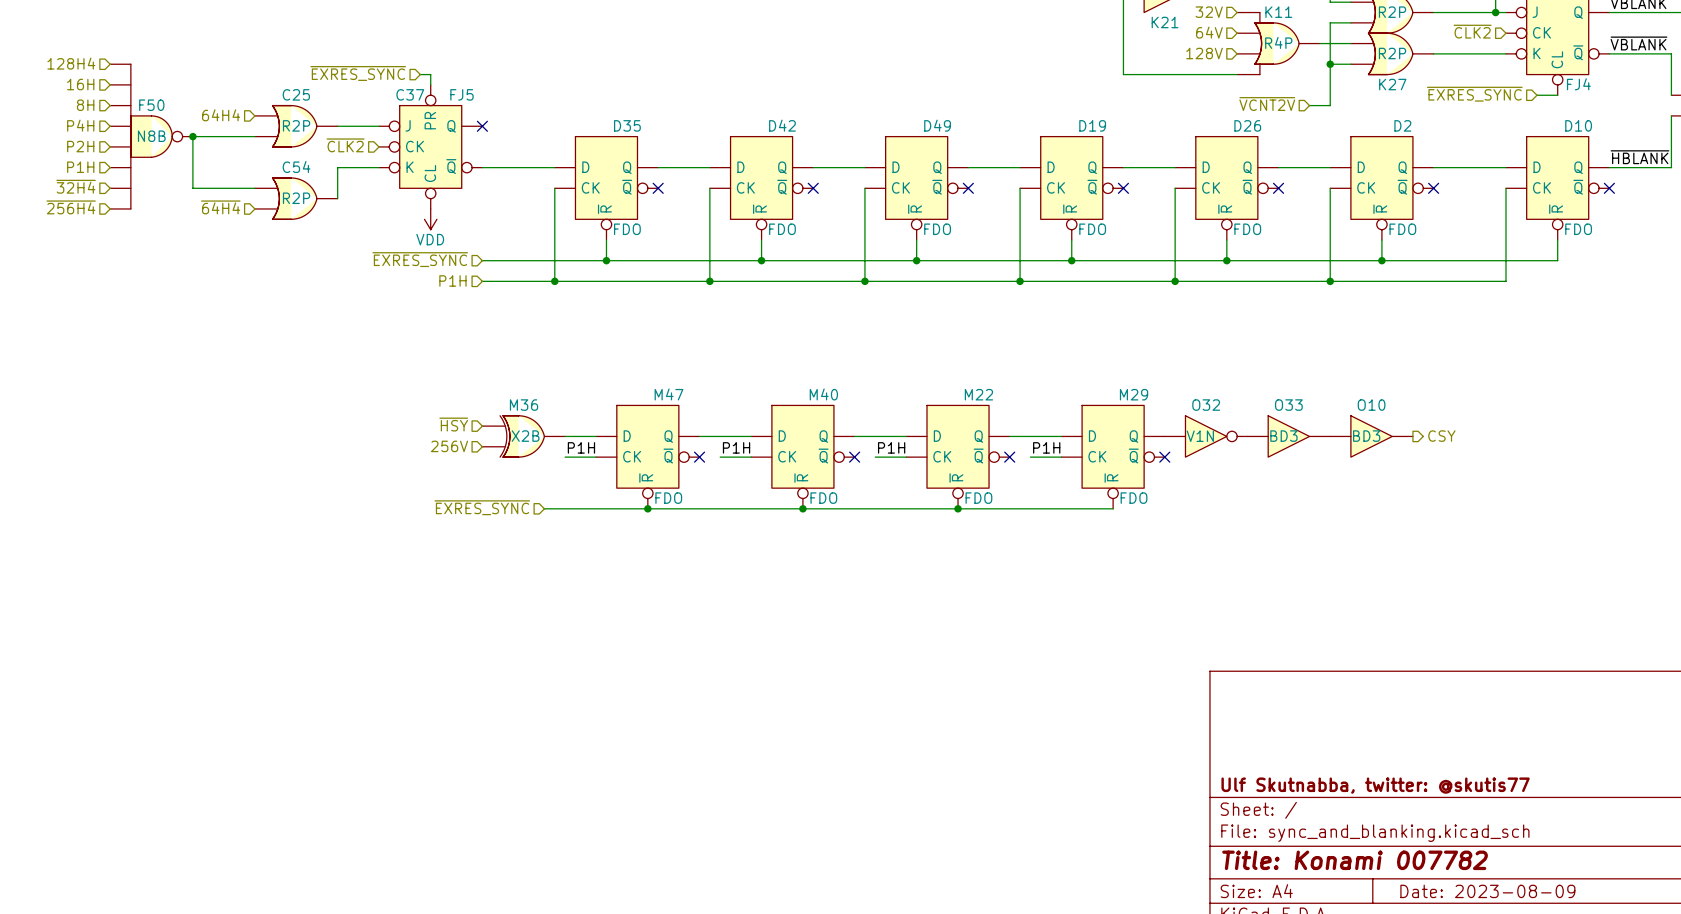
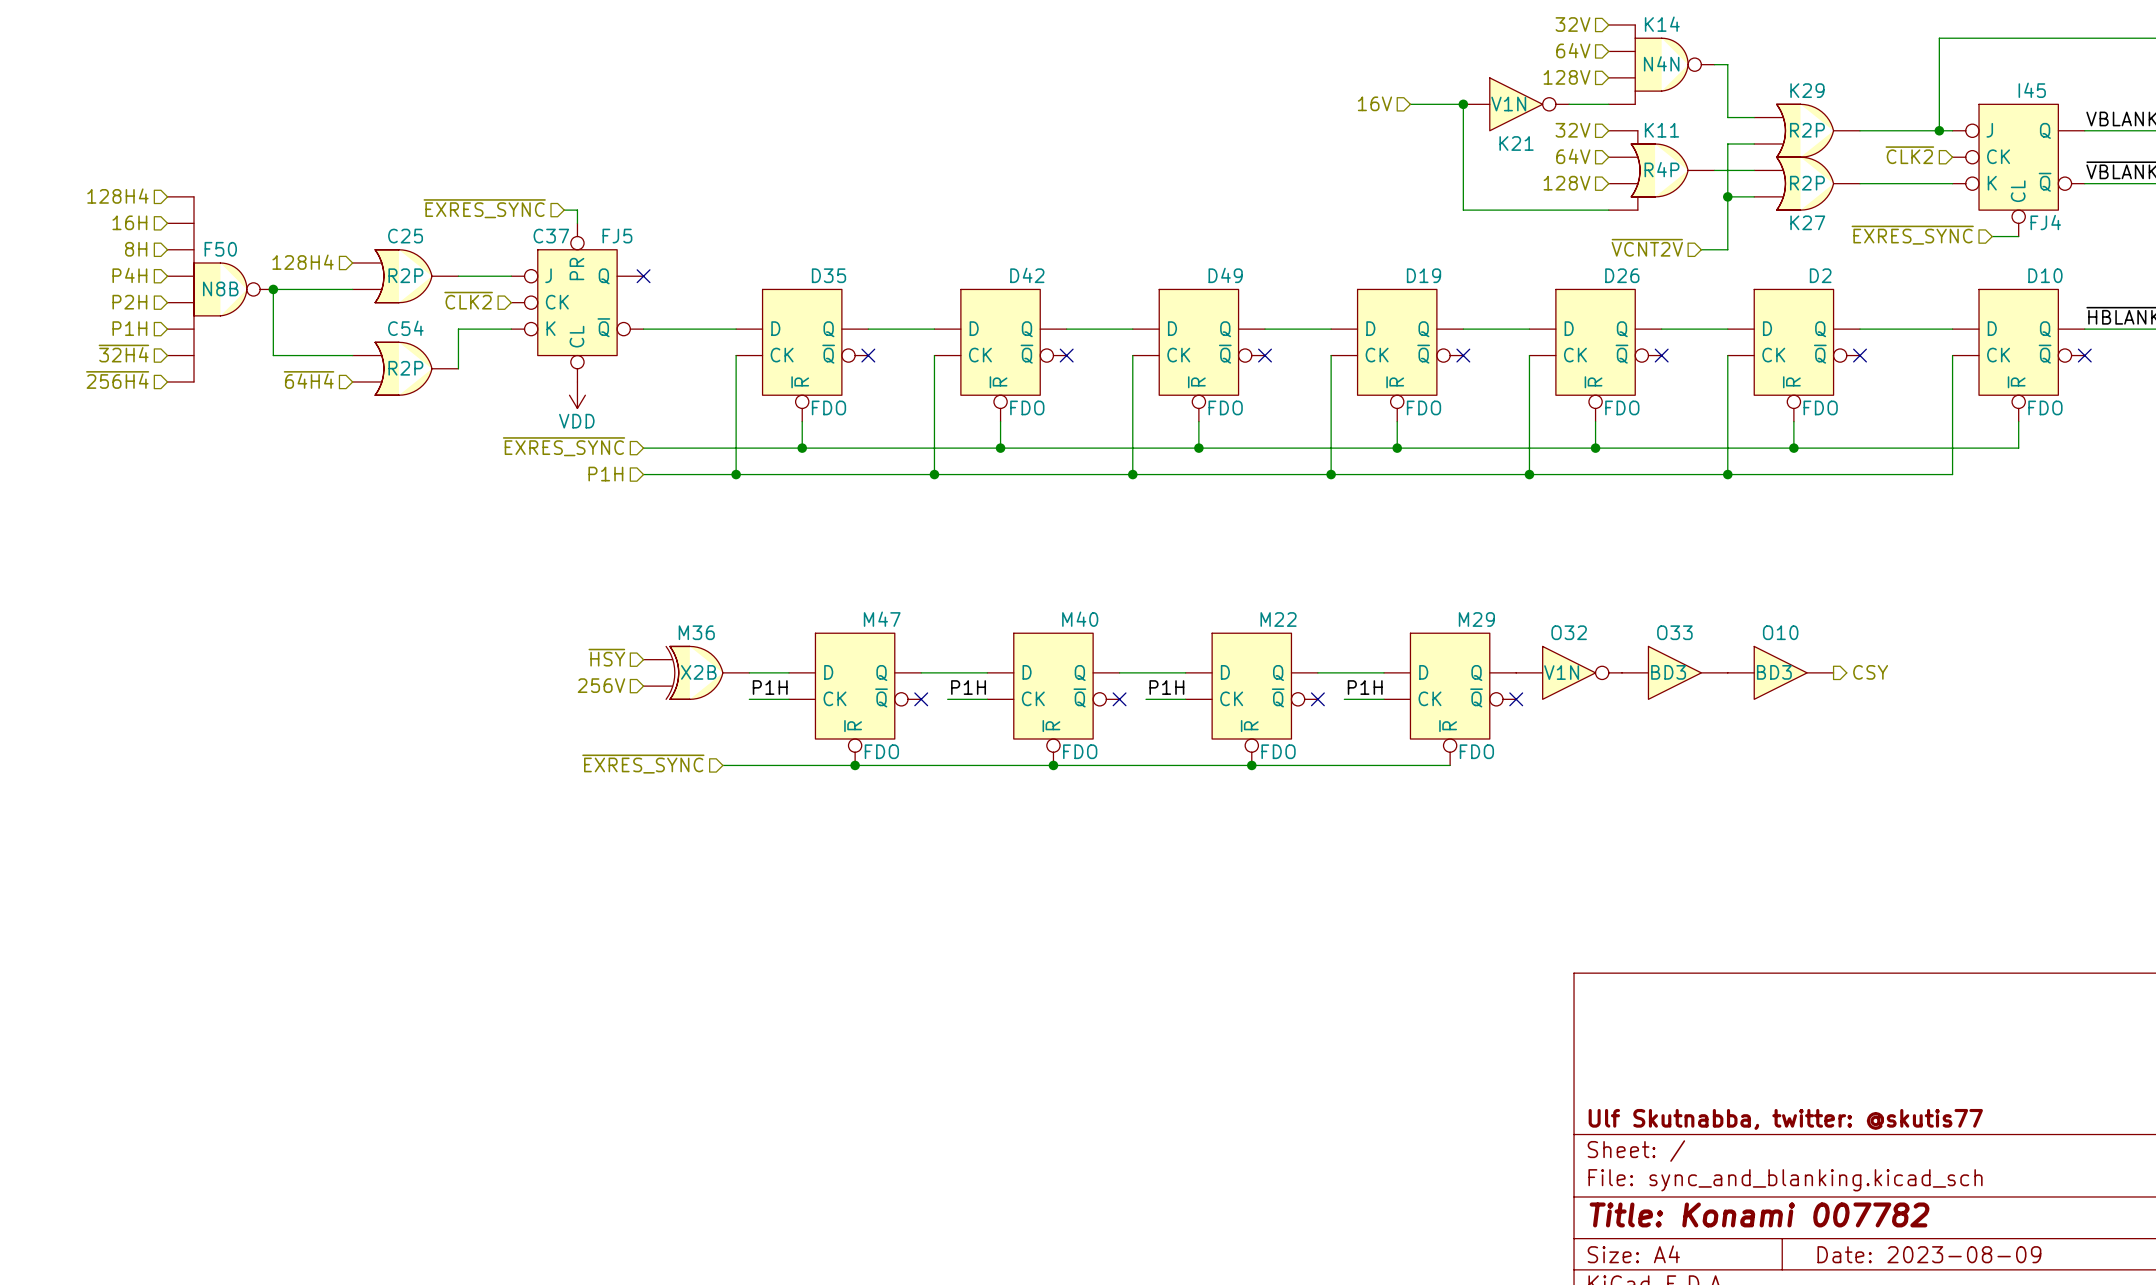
hierarchical label: 64H4 (221, 115) -> 128H4 (303, 262)

